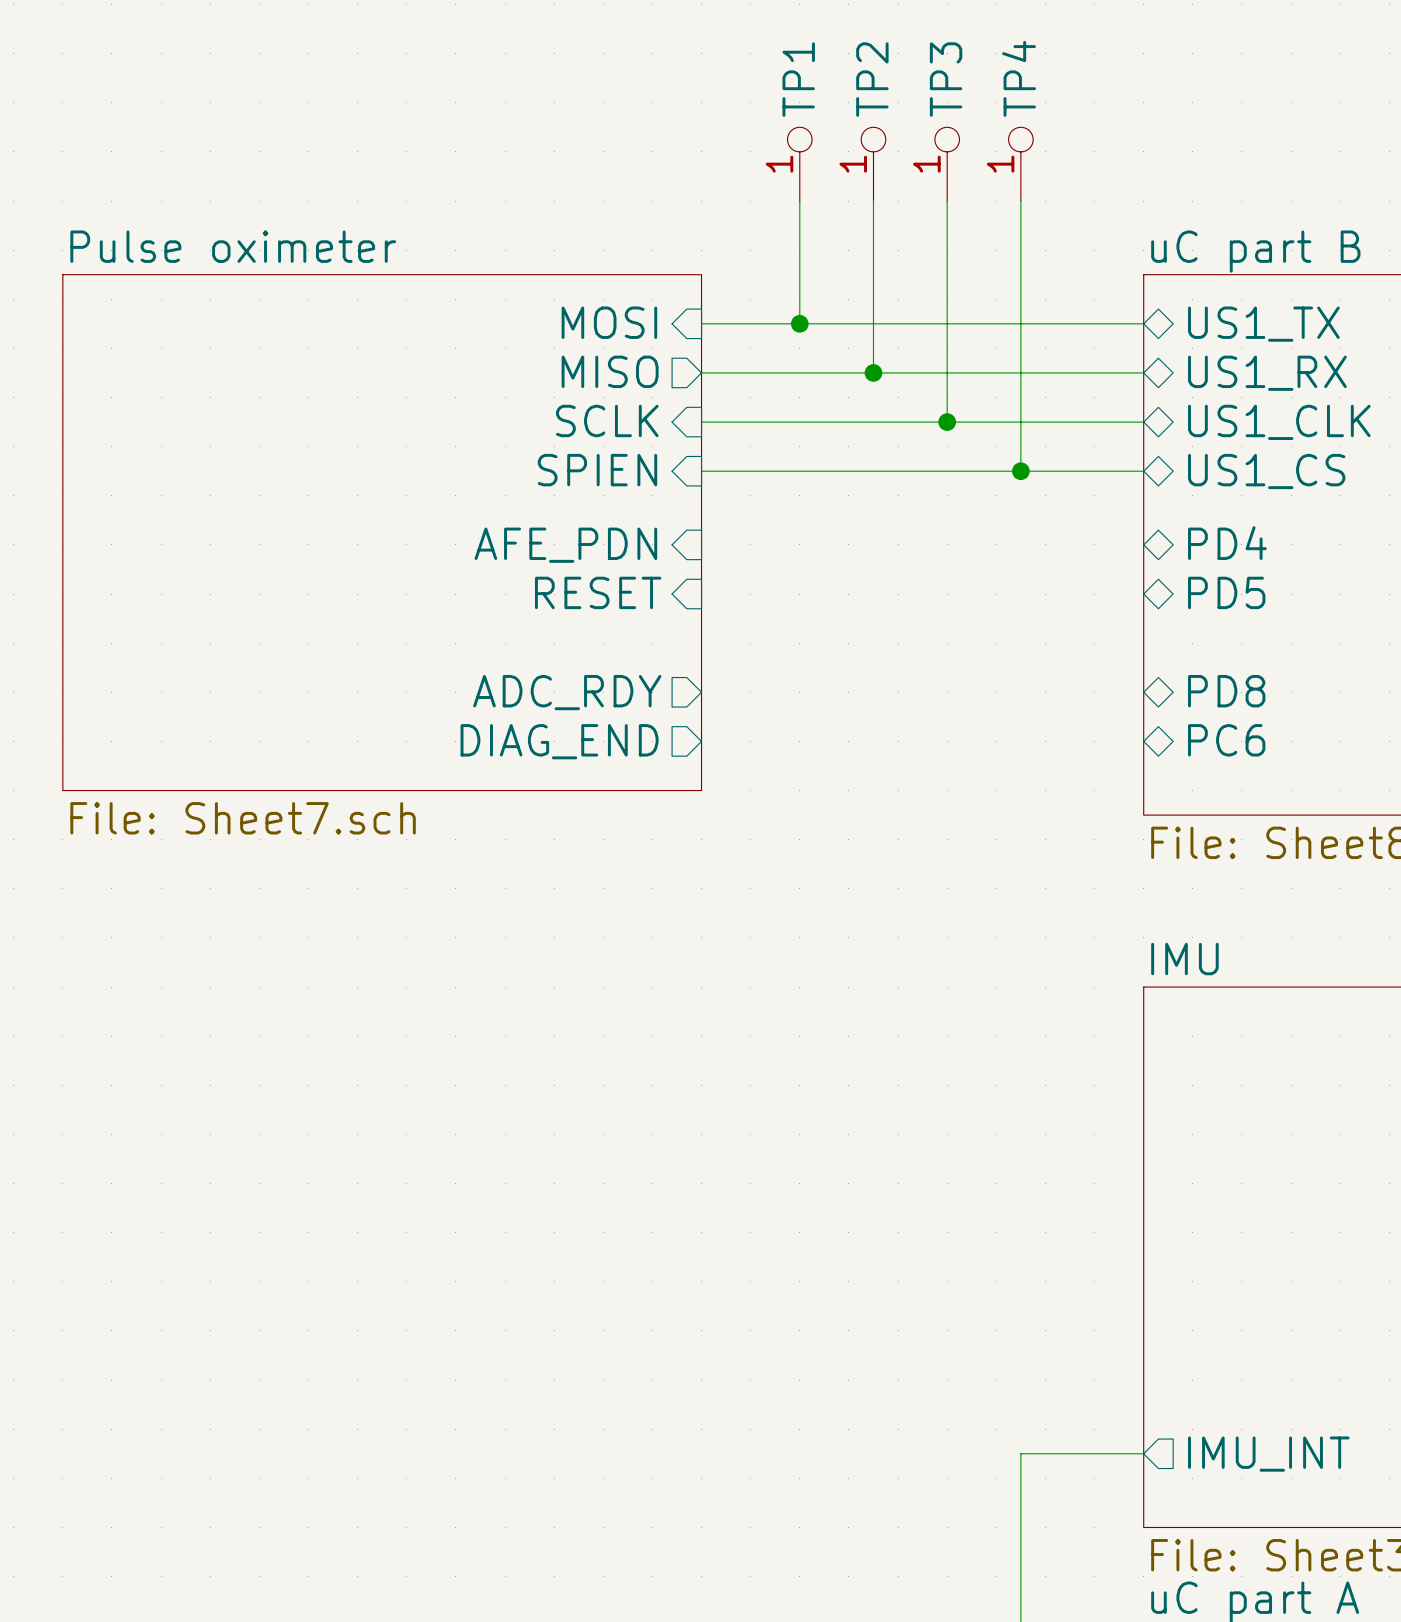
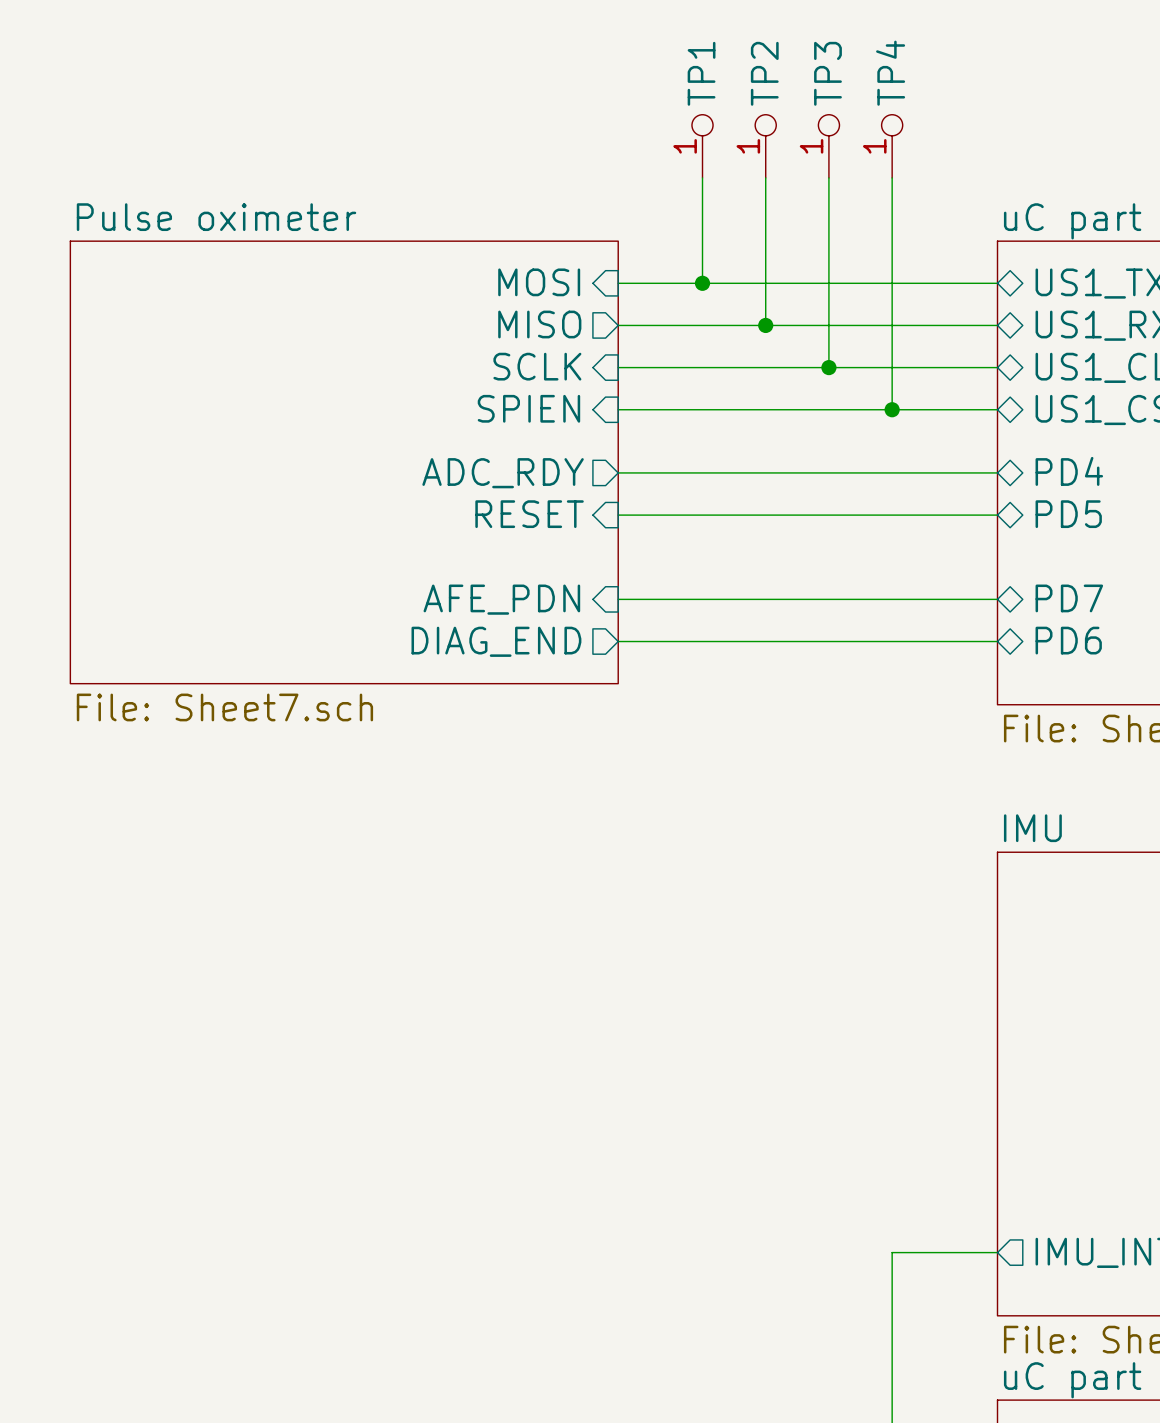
wire: none -> (618, 472) (997, 472)
sheet pin shape: input (565, 545) -> output (503, 473)
sheet pin: AFE_PDN (565, 545) -> ADC_RDY (503, 473)
wire: none -> (618, 515) (997, 515)
sheet pin: PD8 (1226, 691) -> PD7 (1069, 598)
sheet pin shape: output (567, 692) -> input (501, 599)
sheet pin: ADC_RDY (567, 692) -> AFE_PDN (501, 599)
wire: none -> (618, 599) (997, 599)
sheet pin: PC6 (1226, 740) -> PD6 (1068, 640)
wire: none -> (618, 641) (997, 641)

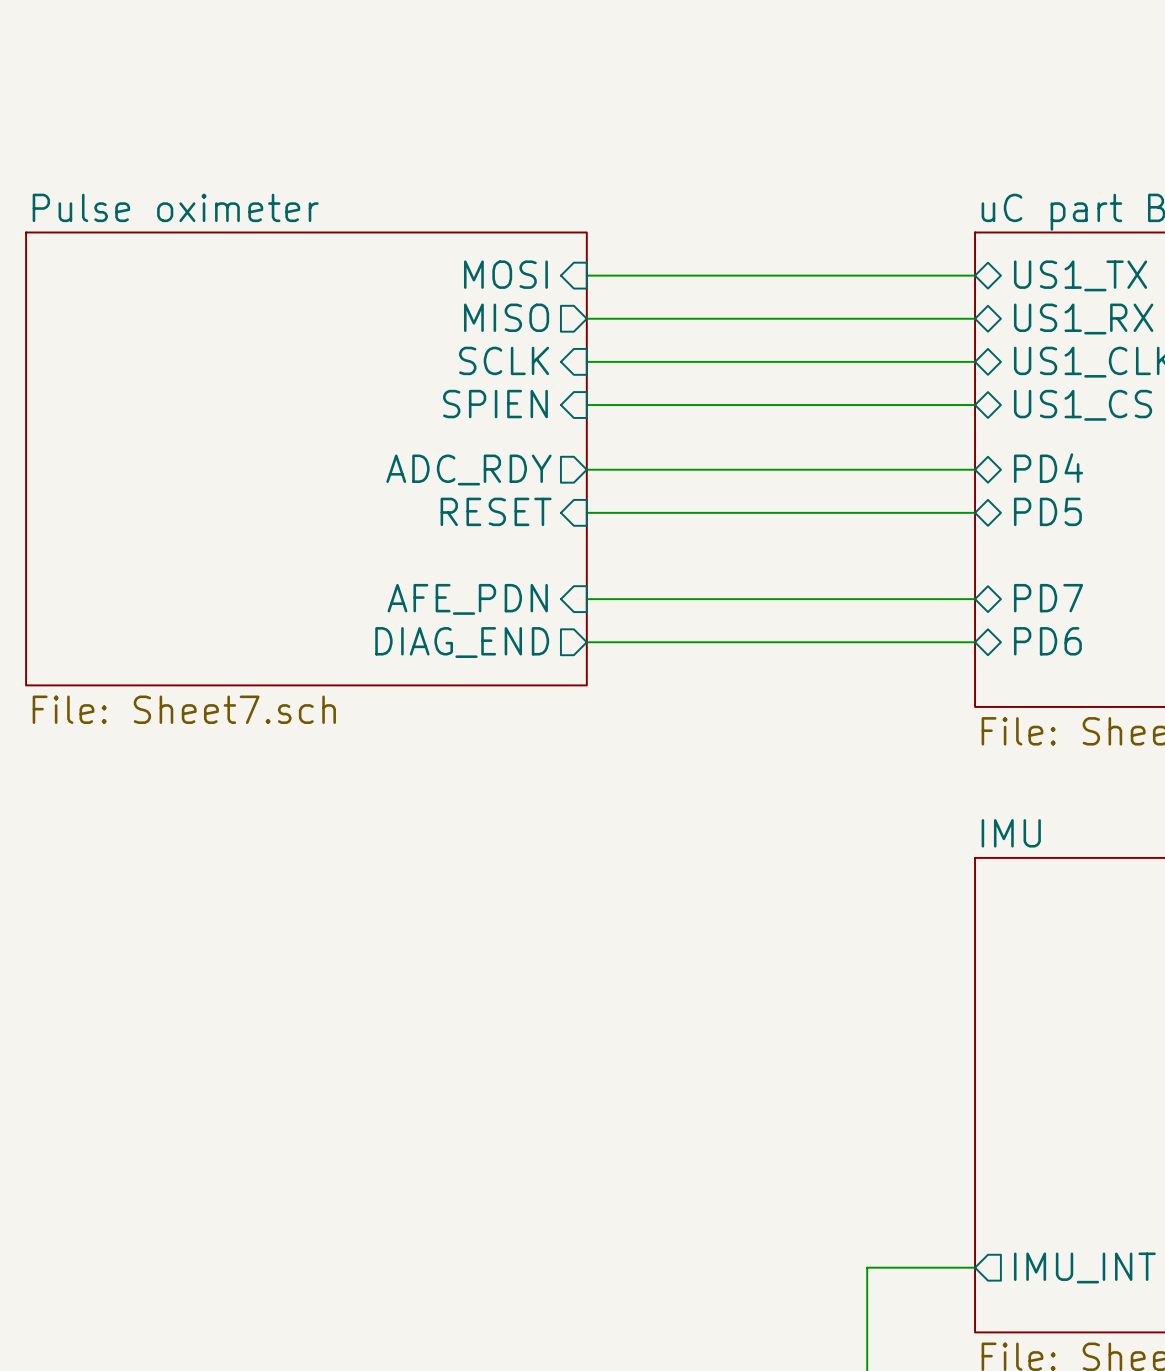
TP1: (702, 146) -> none
TP2: (765, 146) -> none
TP3: (828, 146) -> none
TP4: (892, 146) -> none
wire: (702, 177) (702, 283) -> none
wire: (765, 177) (765, 325) -> none
wire: (828, 177) (828, 367) -> none
wire: (892, 177) (892, 409) -> none
junction: (702, 283) -> none
junction: (765, 325) -> none
junction: (828, 367) -> none
junction: (892, 409) -> none

